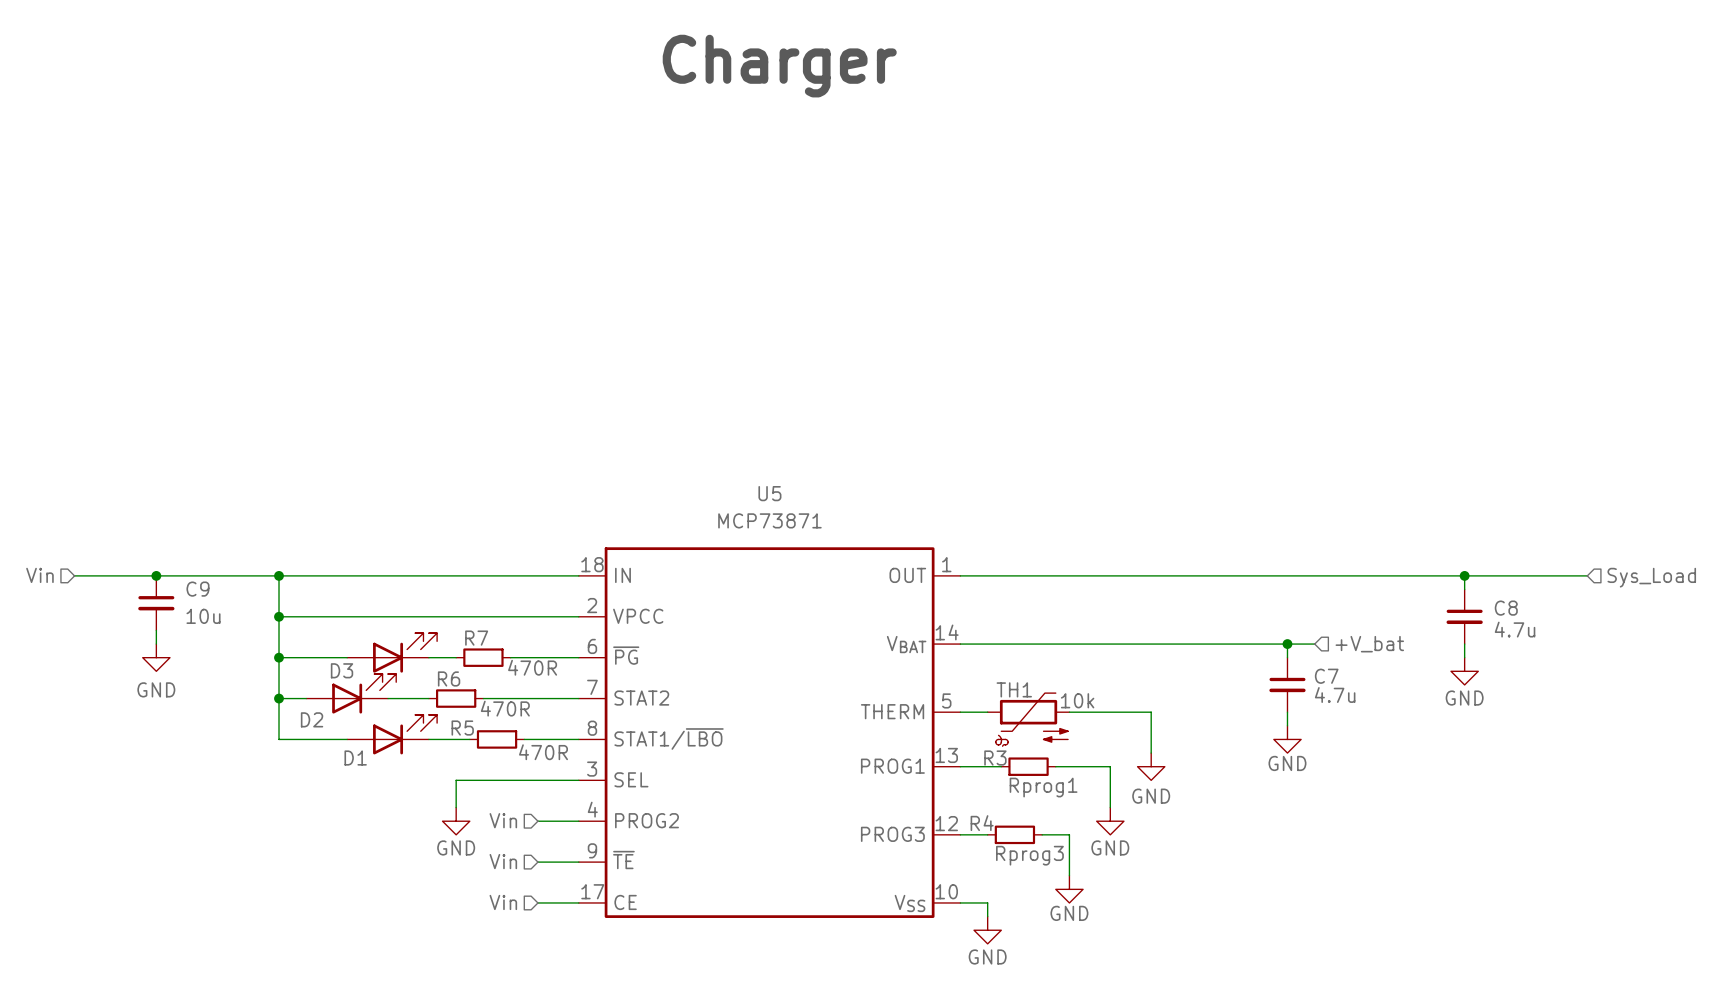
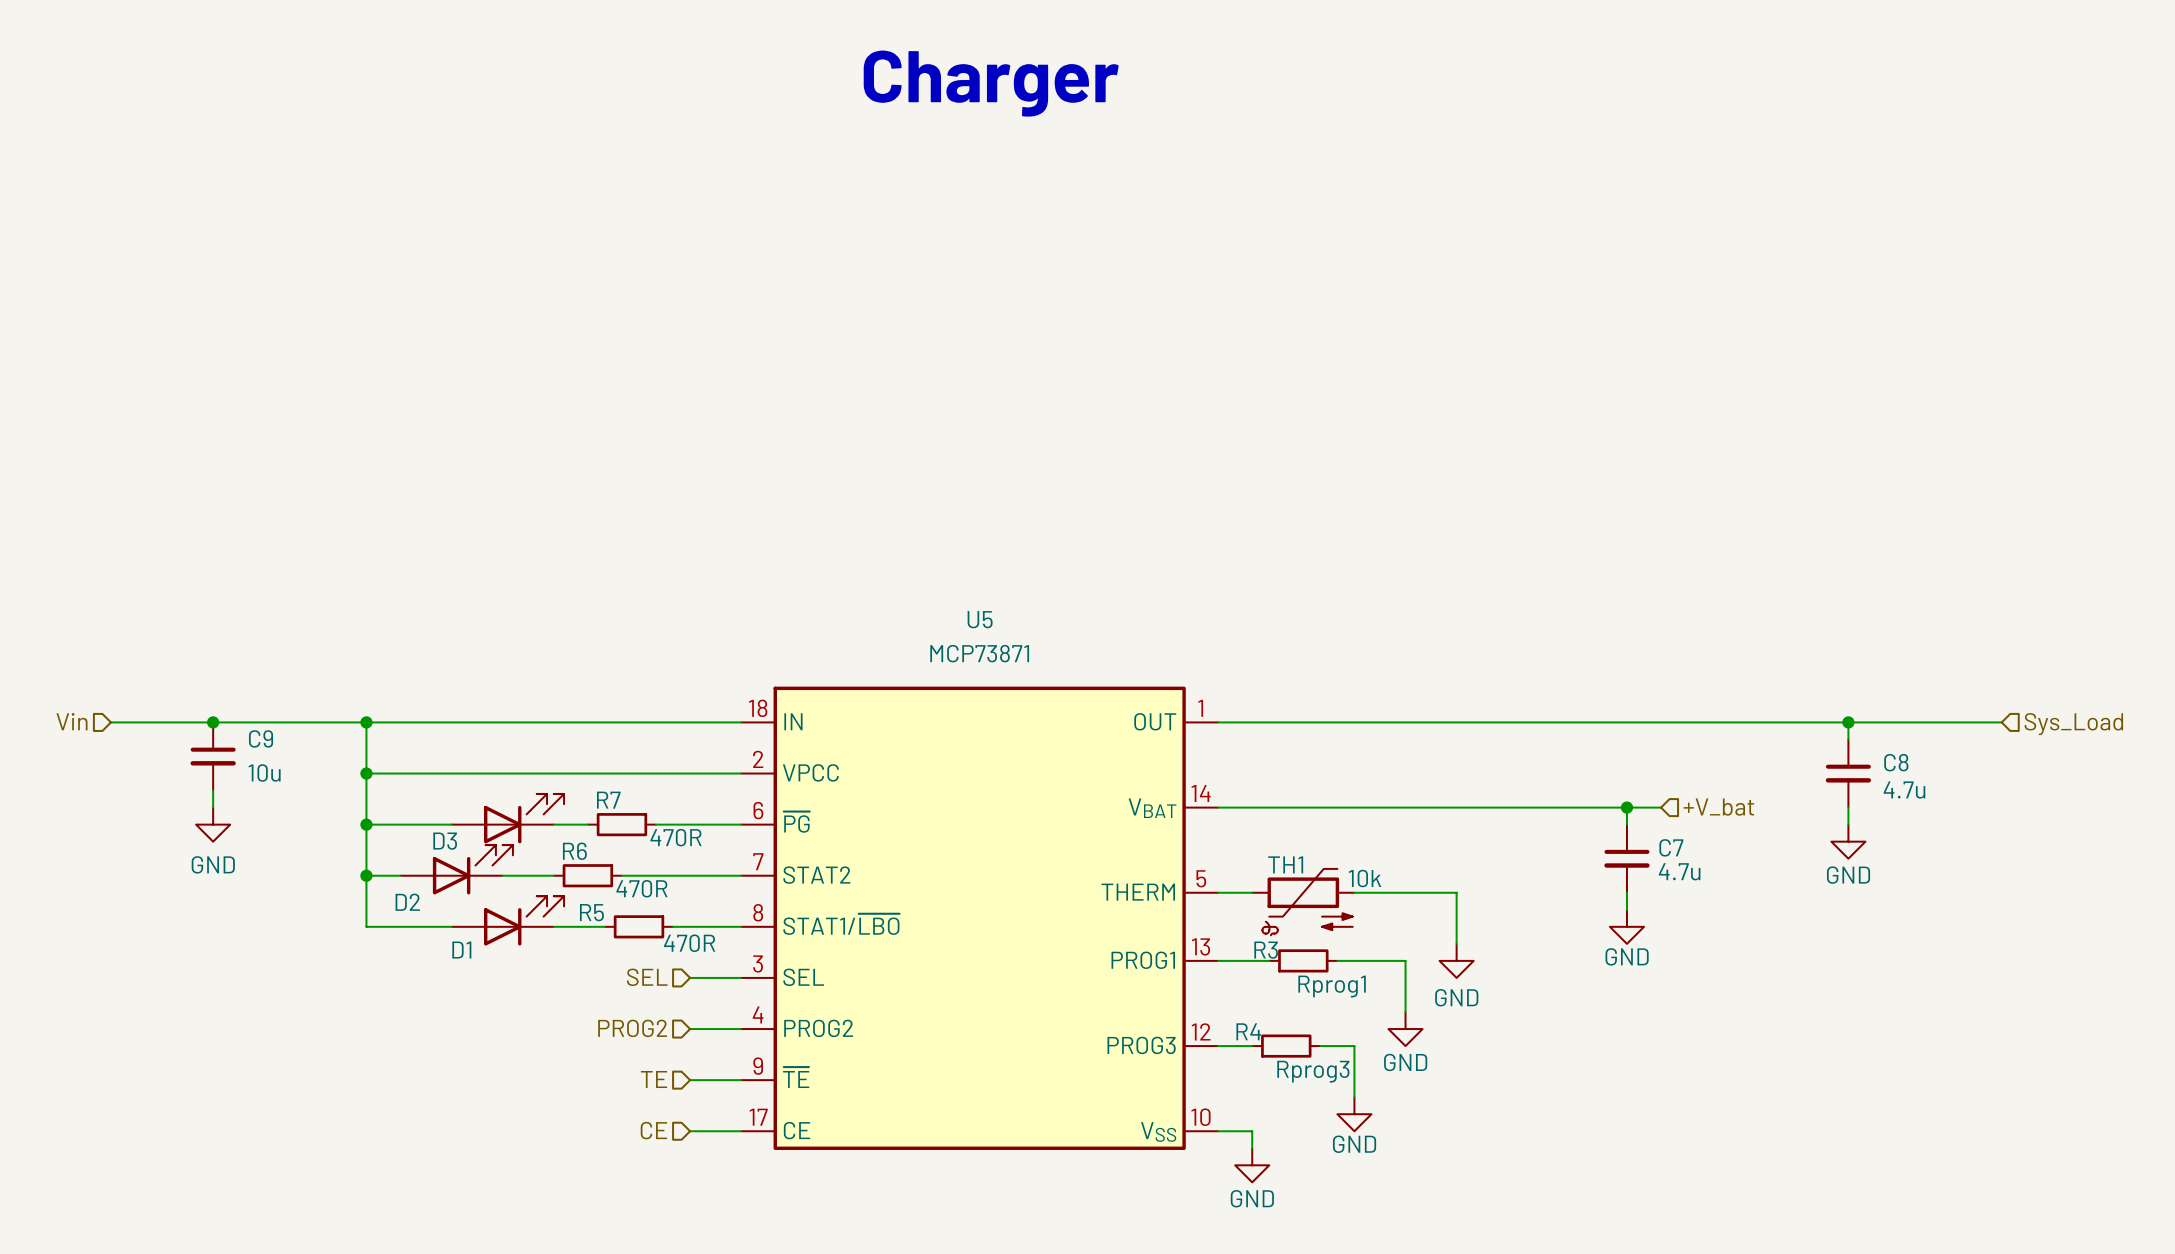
hierarchical label: none -> SEL (647, 977)
wire: (537, 780) (456, 780) (456, 807) -> none
hierarchical label: Vin (503, 820) -> PROG2 (632, 1028)
power symbol: GND (456, 821) -> none
hierarchical label: Vin (503, 861) -> TE (654, 1079)
hierarchical label: Vin (503, 902) -> CE (653, 1130)

